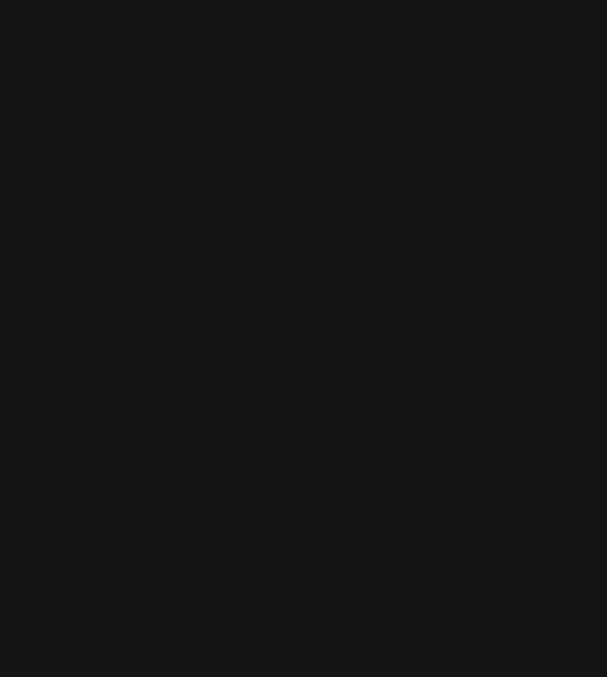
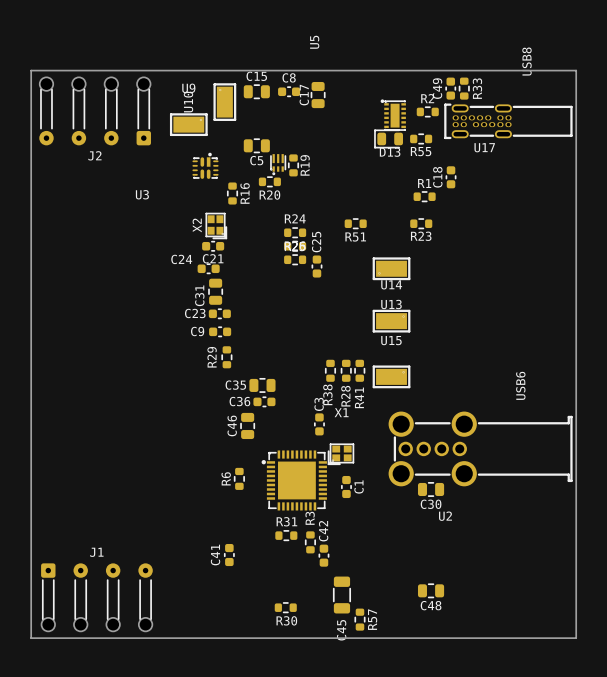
board edge: none -> (31, 70) (576, 70) (576, 638) (31, 638) (31, 70)
C49: none -> (450, 88)
R33: none -> (464, 88)
C15: none -> (256, 91)
C8: none -> (289, 91)
C17: none -> (318, 95)
U10: none -> (224, 102)
J2: none -> (95, 111)
R2: none -> (427, 111)
U17: none -> (393, 115)
USB8: none -> (508, 121)
U9: none -> (188, 124)
D13: none -> (388, 138)
R55: none -> (421, 138)
C5: none -> (256, 145)
U5: none -> (278, 164)
U3: none -> (205, 165)
R19: none -> (293, 165)
C18: none -> (451, 177)
R20: none -> (269, 181)
R16: none -> (232, 193)
R1: none -> (424, 196)
R51: none -> (355, 223)
R23: none -> (421, 223)
X2: none -> (216, 225)
R24: none -> (295, 232)
C21: none -> (213, 246)
part: none -> (295, 246)
part: none -> (295, 259)
C25: none -> (316, 266)
C24: none -> (208, 268)
U13: none -> (391, 268)
C31: none -> (215, 291)
C23: none -> (219, 313)
U14: none -> (391, 321)
C9: none -> (220, 331)
R29: none -> (226, 357)
R38: none -> (330, 370)
R28: none -> (346, 370)
R41: none -> (359, 370)
U15: none -> (391, 376)
C35: none -> (262, 385)
C36: none -> (264, 401)
C3: none -> (319, 424)
C46: none -> (247, 425)
USB6: none -> (480, 448)
X1: none -> (340, 454)
R6: none -> (239, 478)
U2: none -> (294, 480)
C1: none -> (346, 487)
C30: none -> (431, 489)
R31: none -> (286, 535)
R3: none -> (310, 542)
C41: none -> (229, 555)
C42: none -> (323, 555)
C48: none -> (431, 590)
C45: none -> (341, 595)
J1: none -> (96, 597)
R30: none -> (285, 607)
R57: none -> (359, 619)

